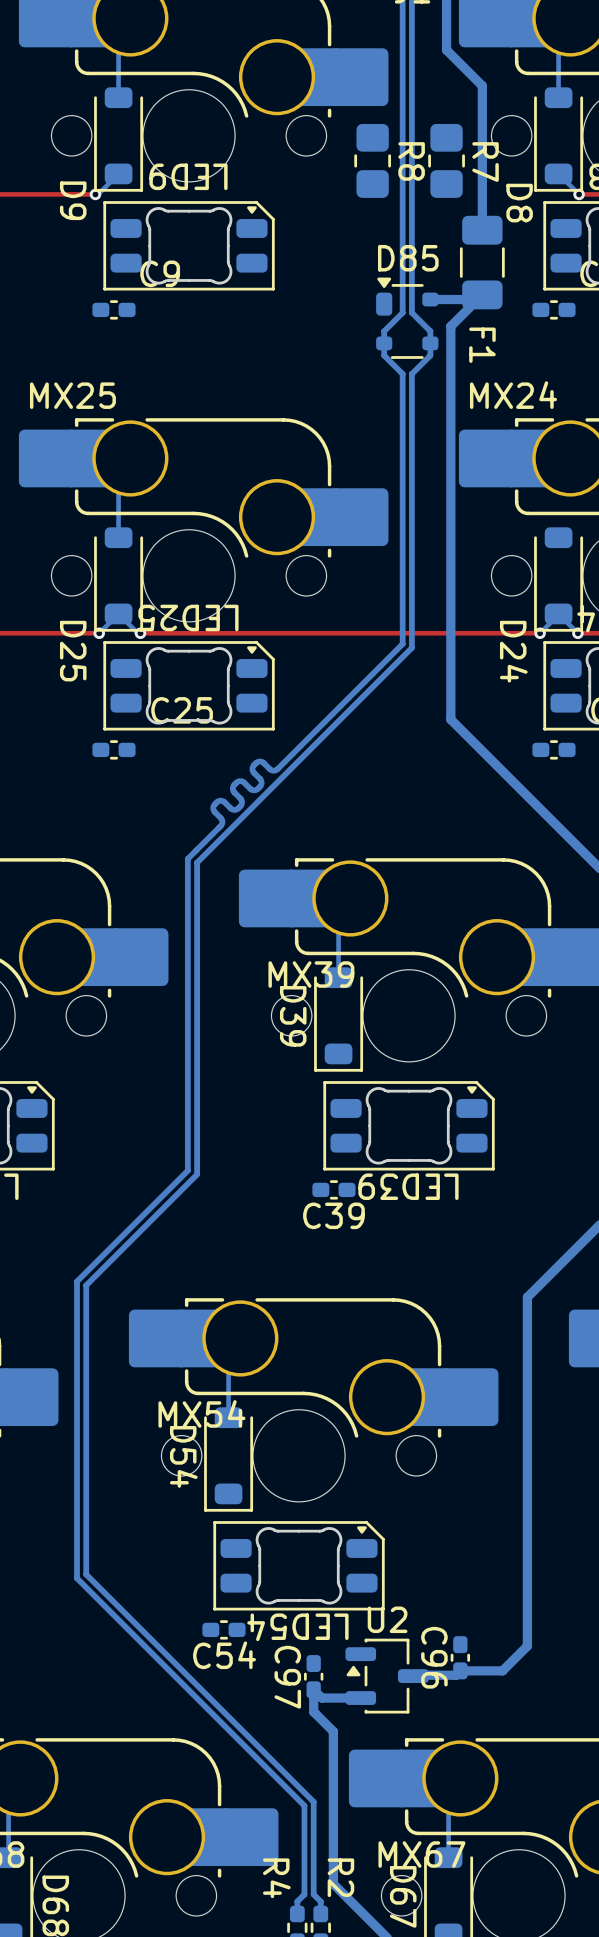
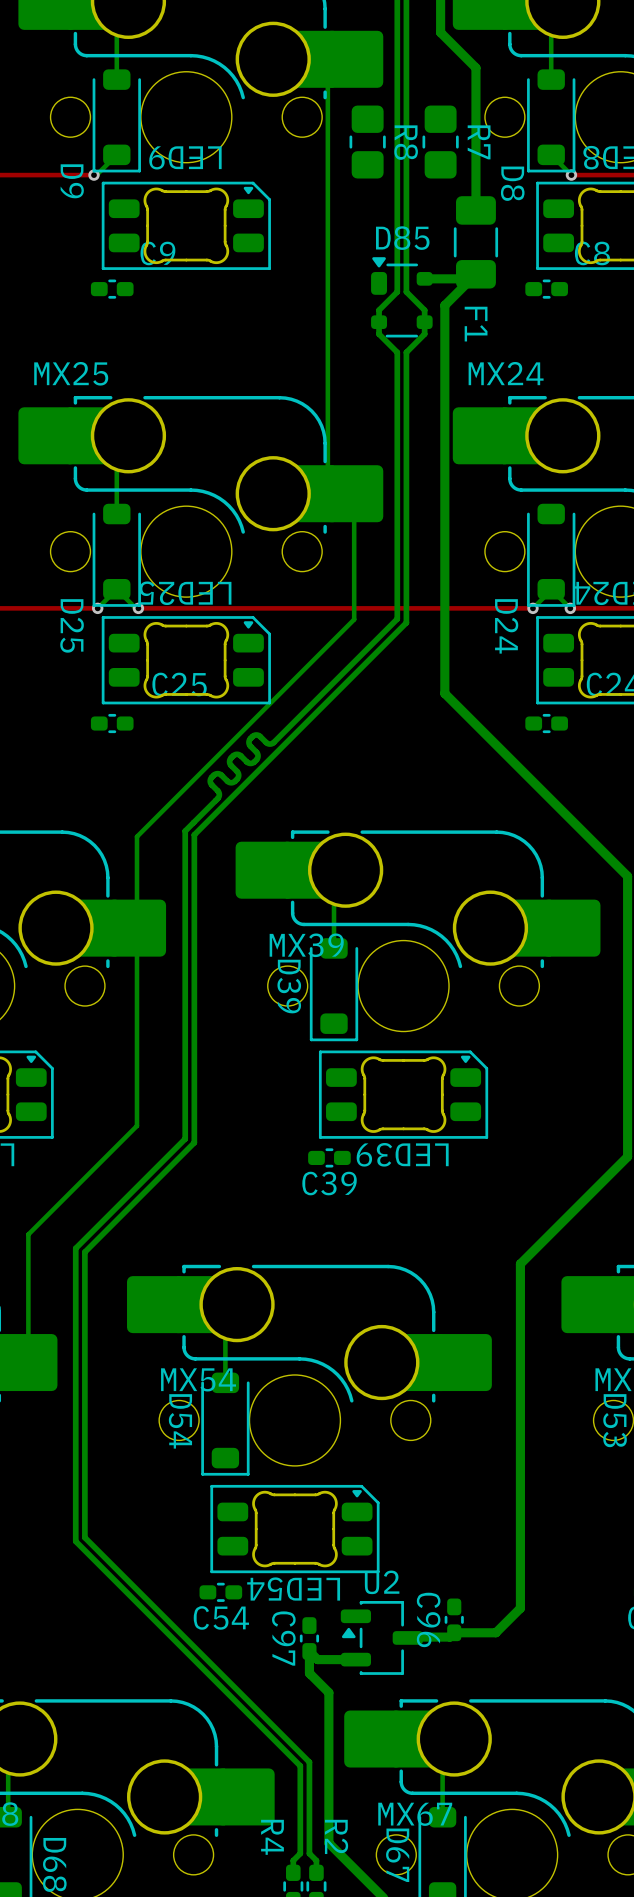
bottom track: none -> (354, 59) (327, 85) (327, 467) (354, 493) (354, 619) (136, 836) (136, 1125) (28, 1234) (28, 1362)

